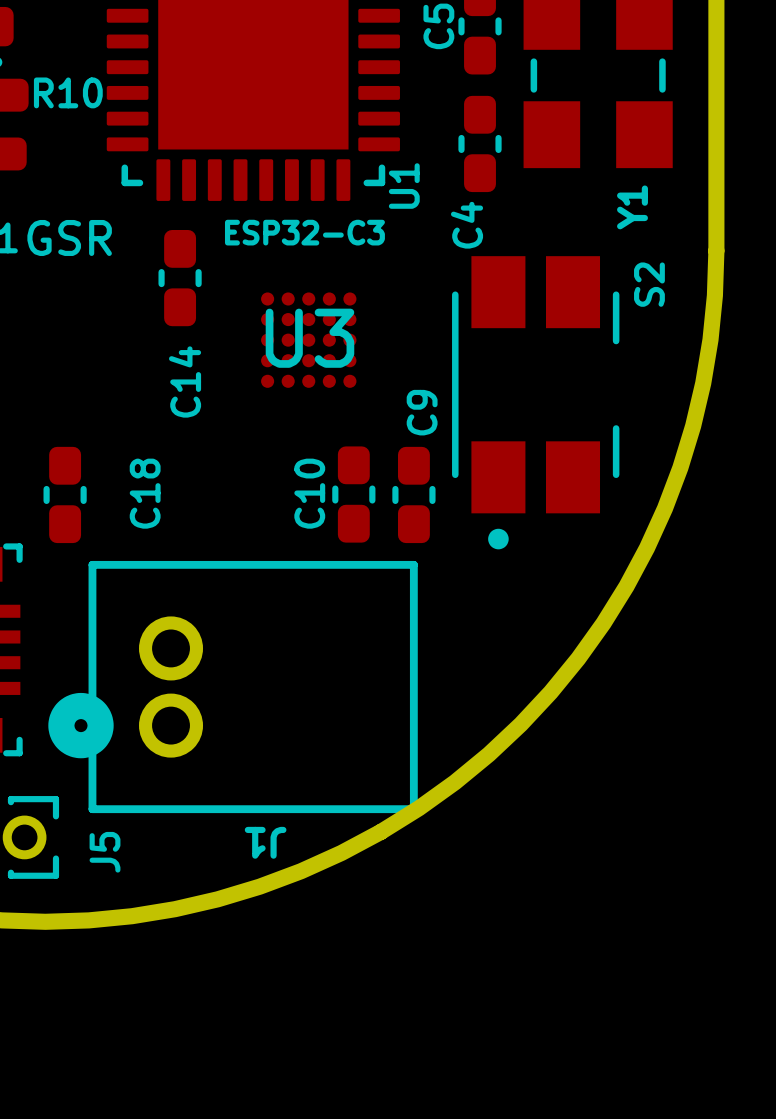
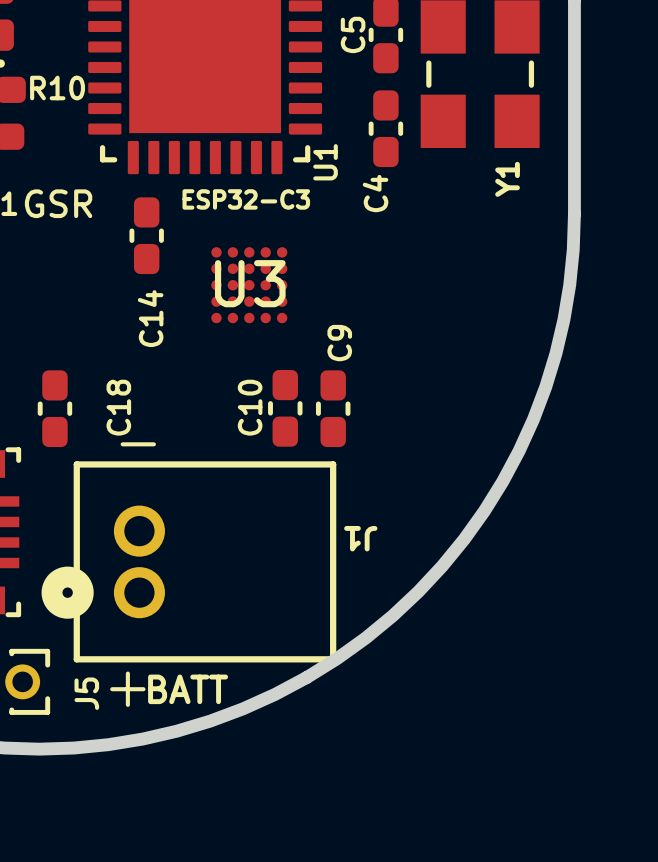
S2: (535, 402) -> none
text: none -> - (138, 444)
J1 name position: J1 (265, 842) -> J1 (360, 538)
text: none -> + (127, 689)
text: none -> BATT (188, 689)

